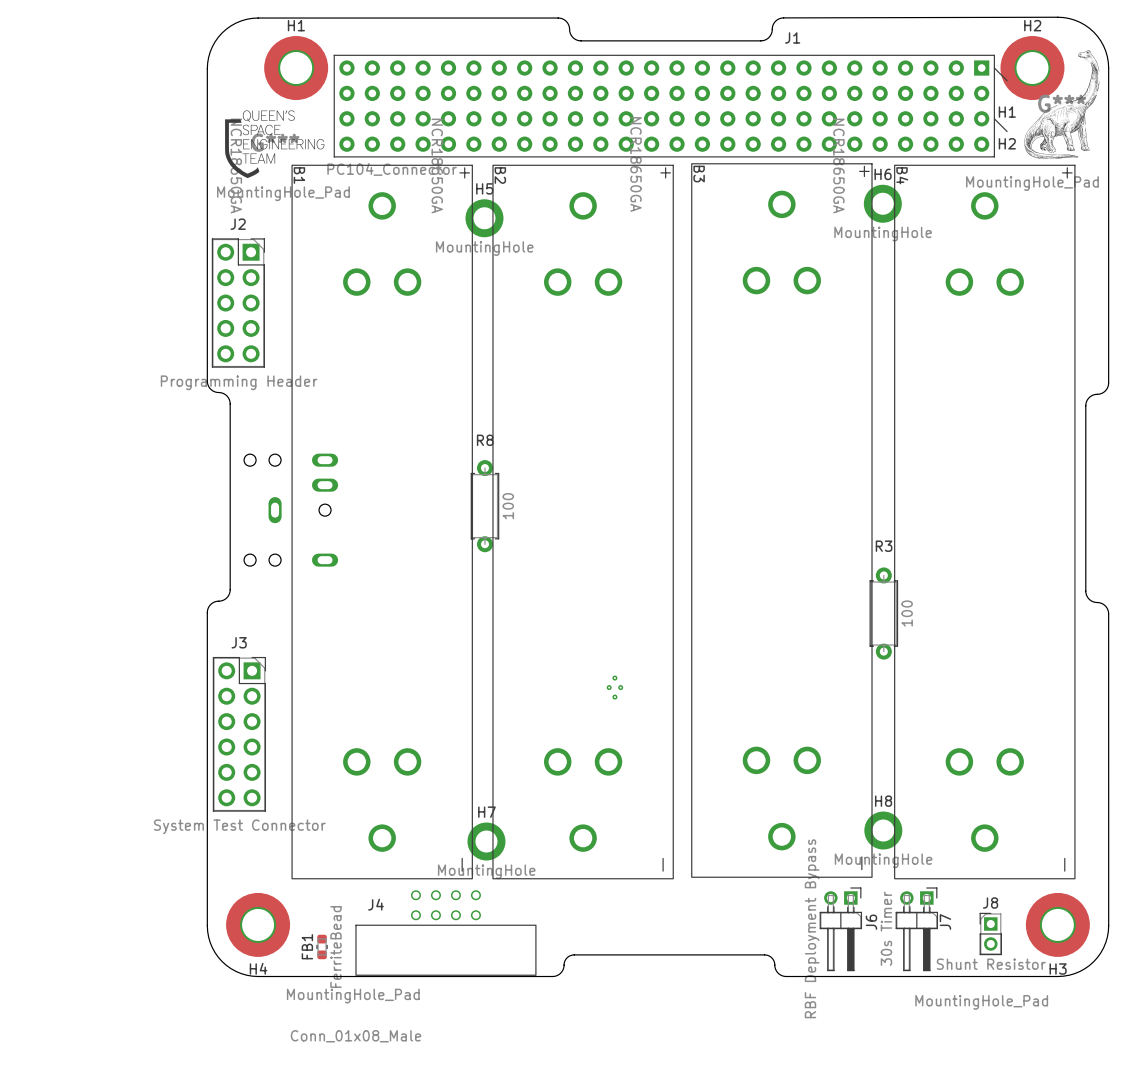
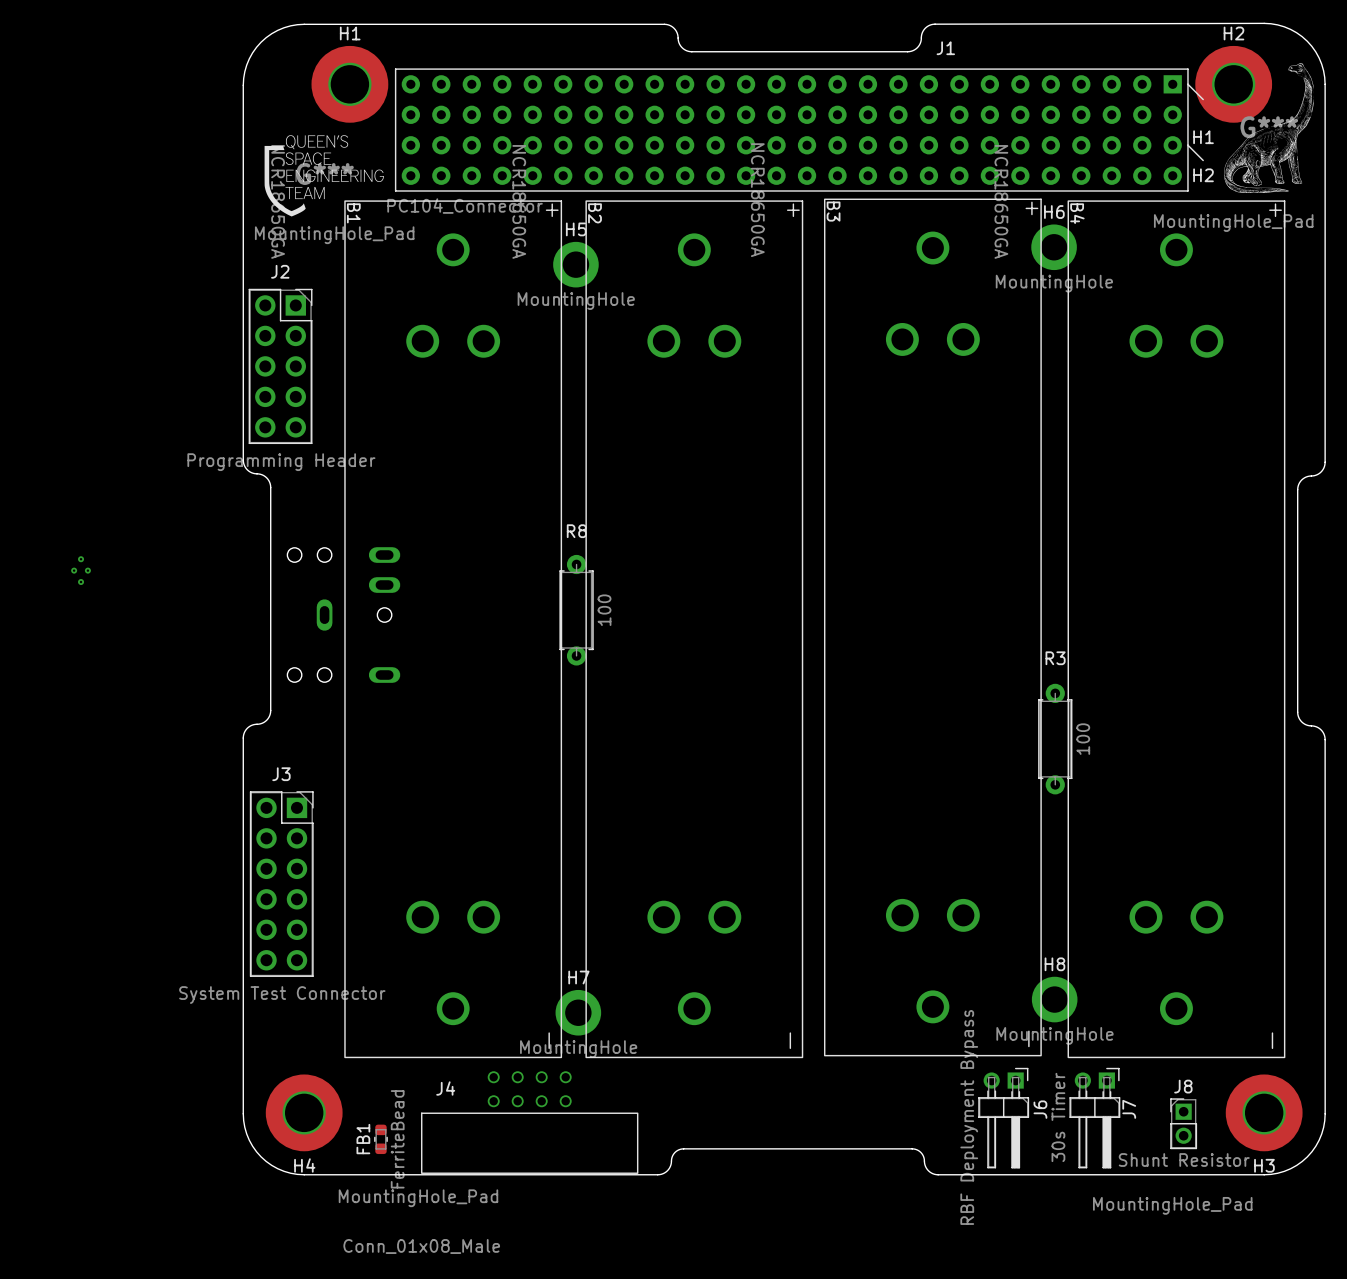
part: none -> (81, 570)
part: (614, 687) -> none

